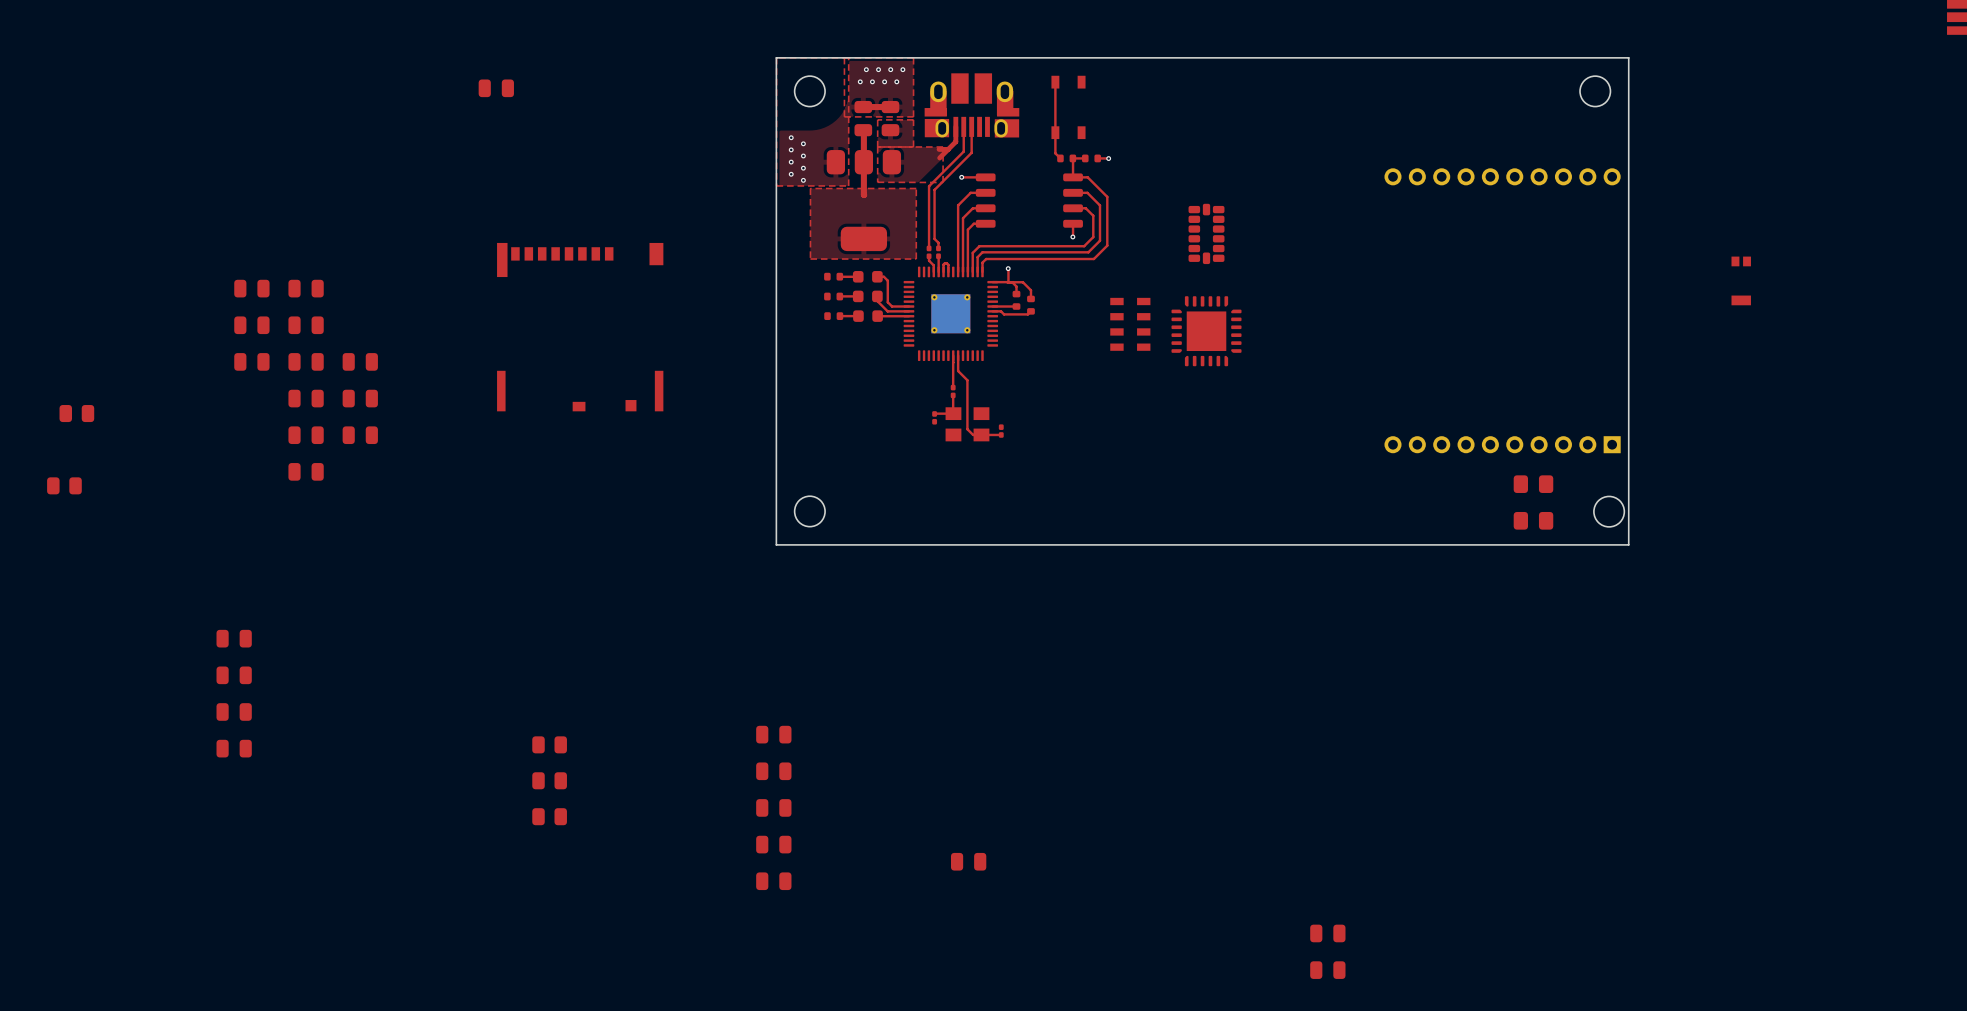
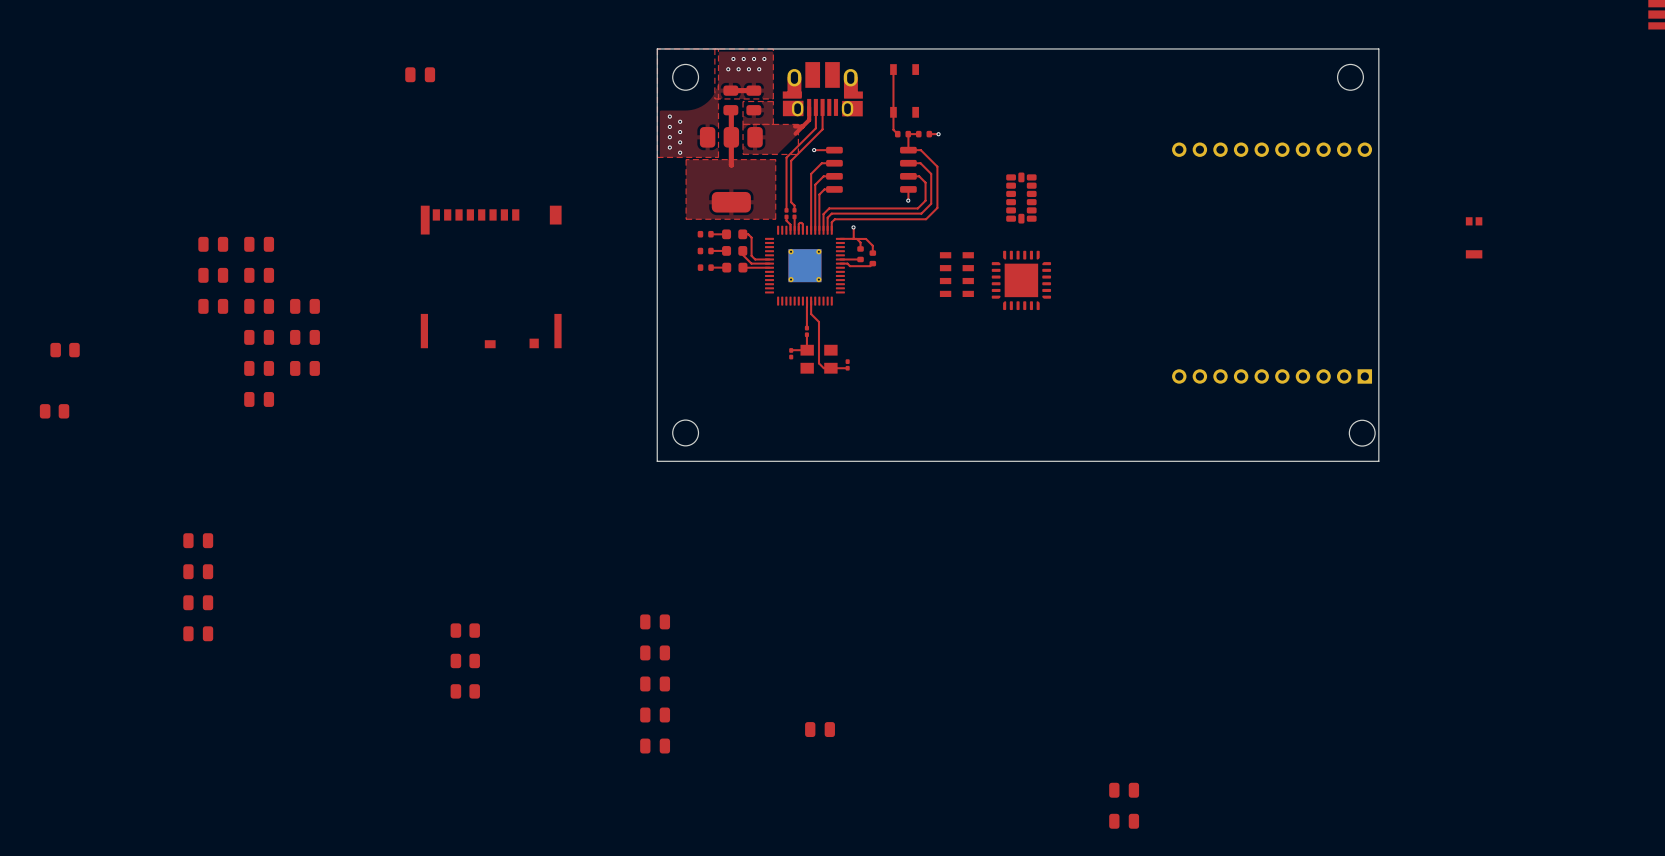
part: (1533, 484) -> none
part: (1533, 520) -> none

